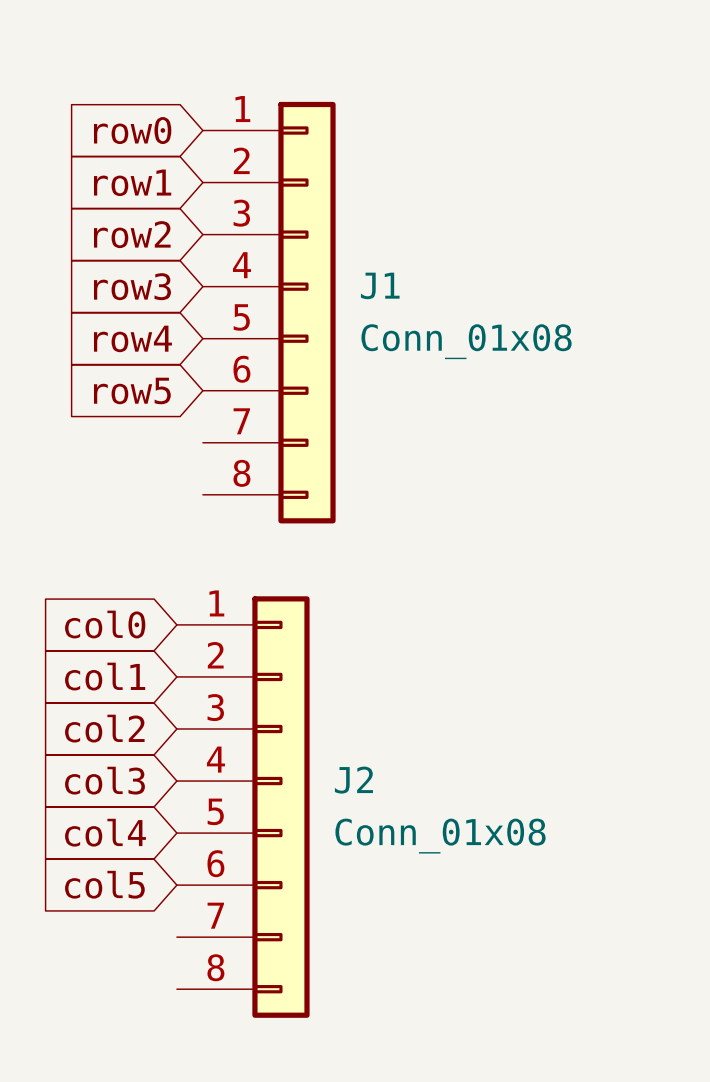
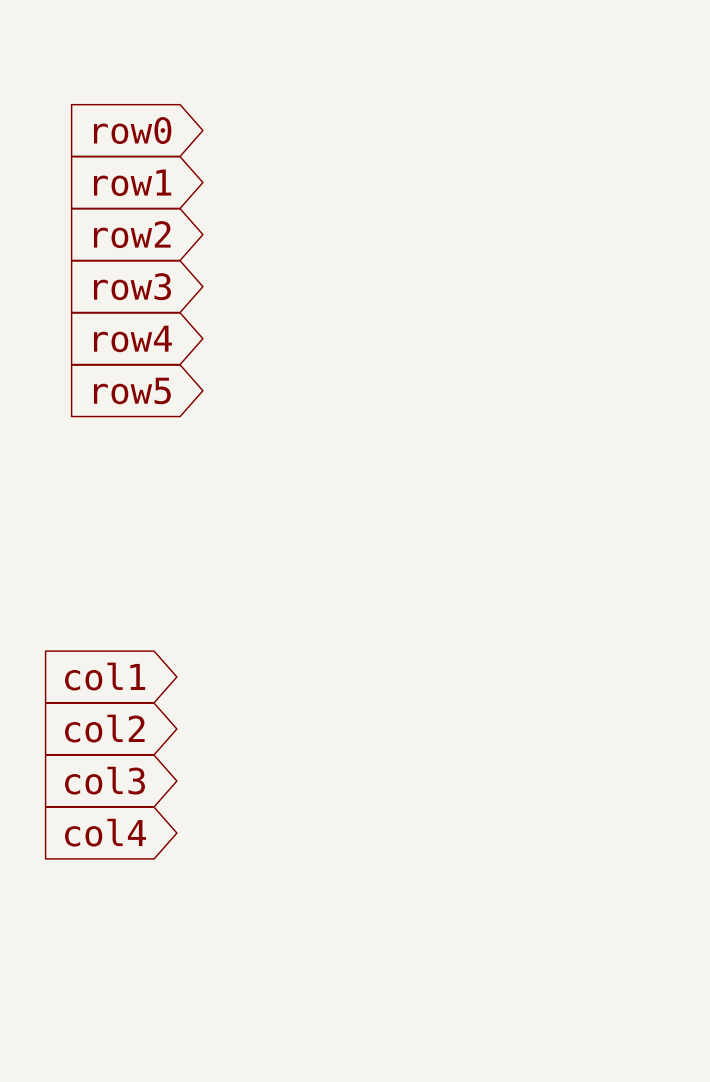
J1: Conn_01x08 (269, 312) -> none
global label: col0 (105, 624) -> none
J2: Conn_01x08 (243, 807) -> none
global label: col5 (104, 884) -> none

